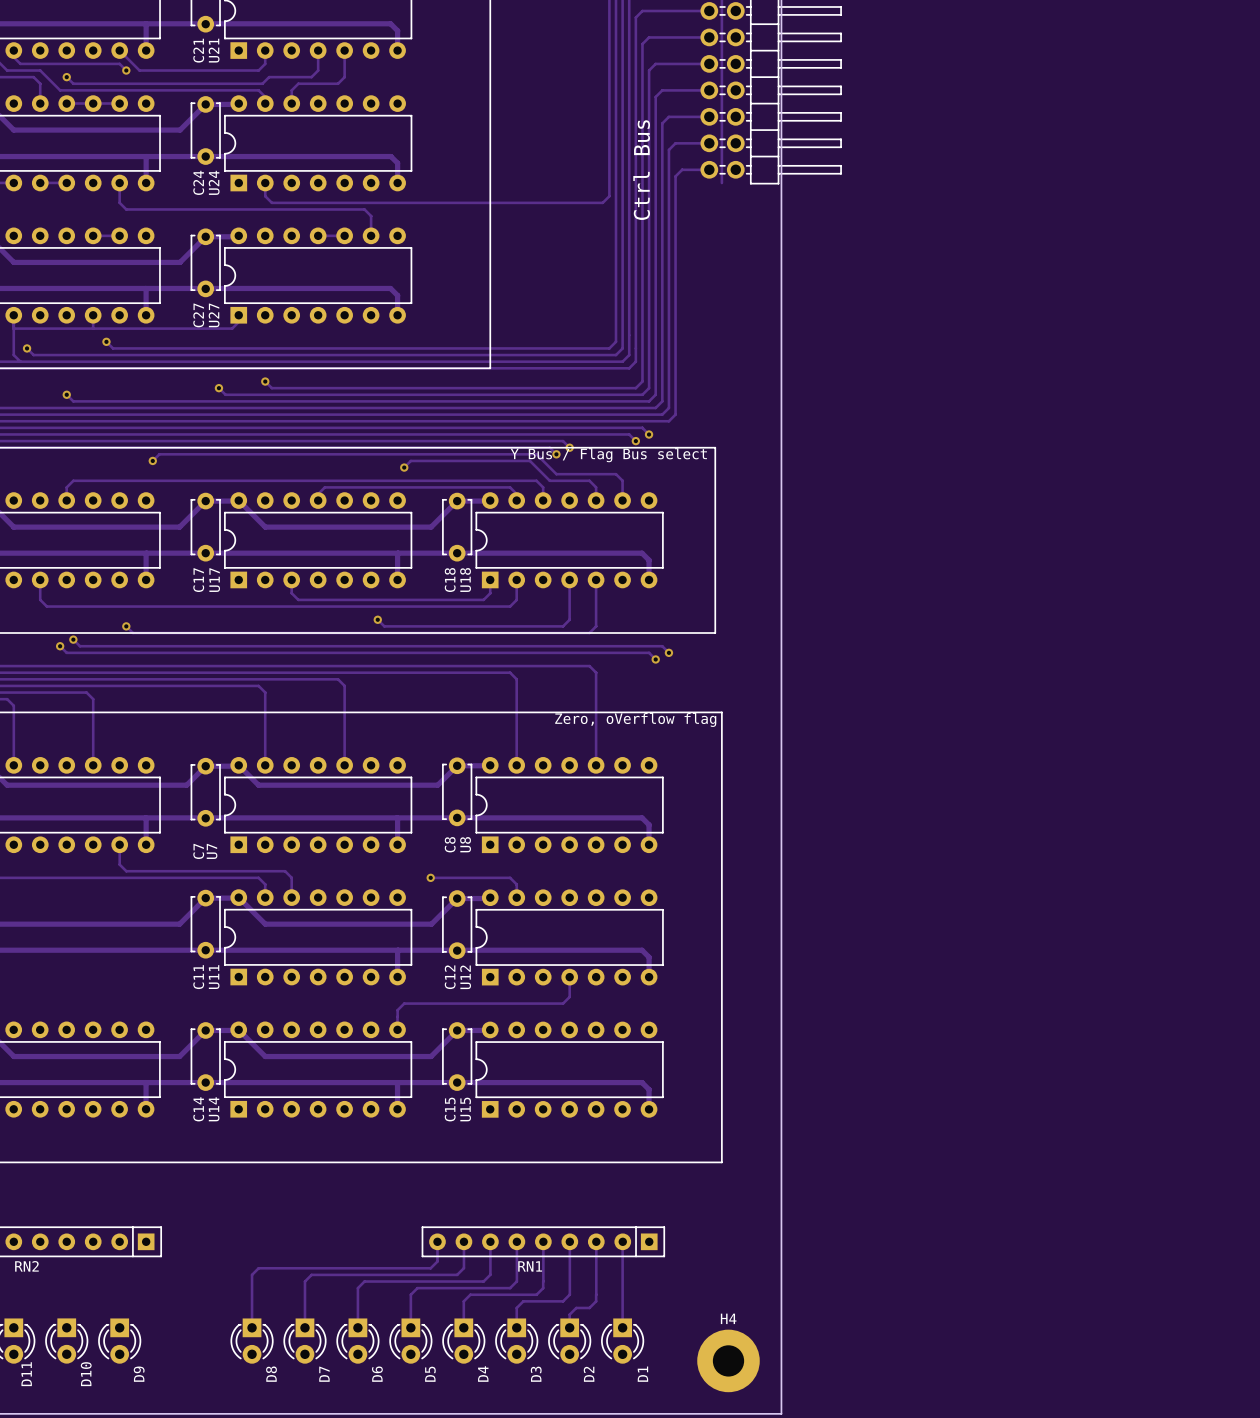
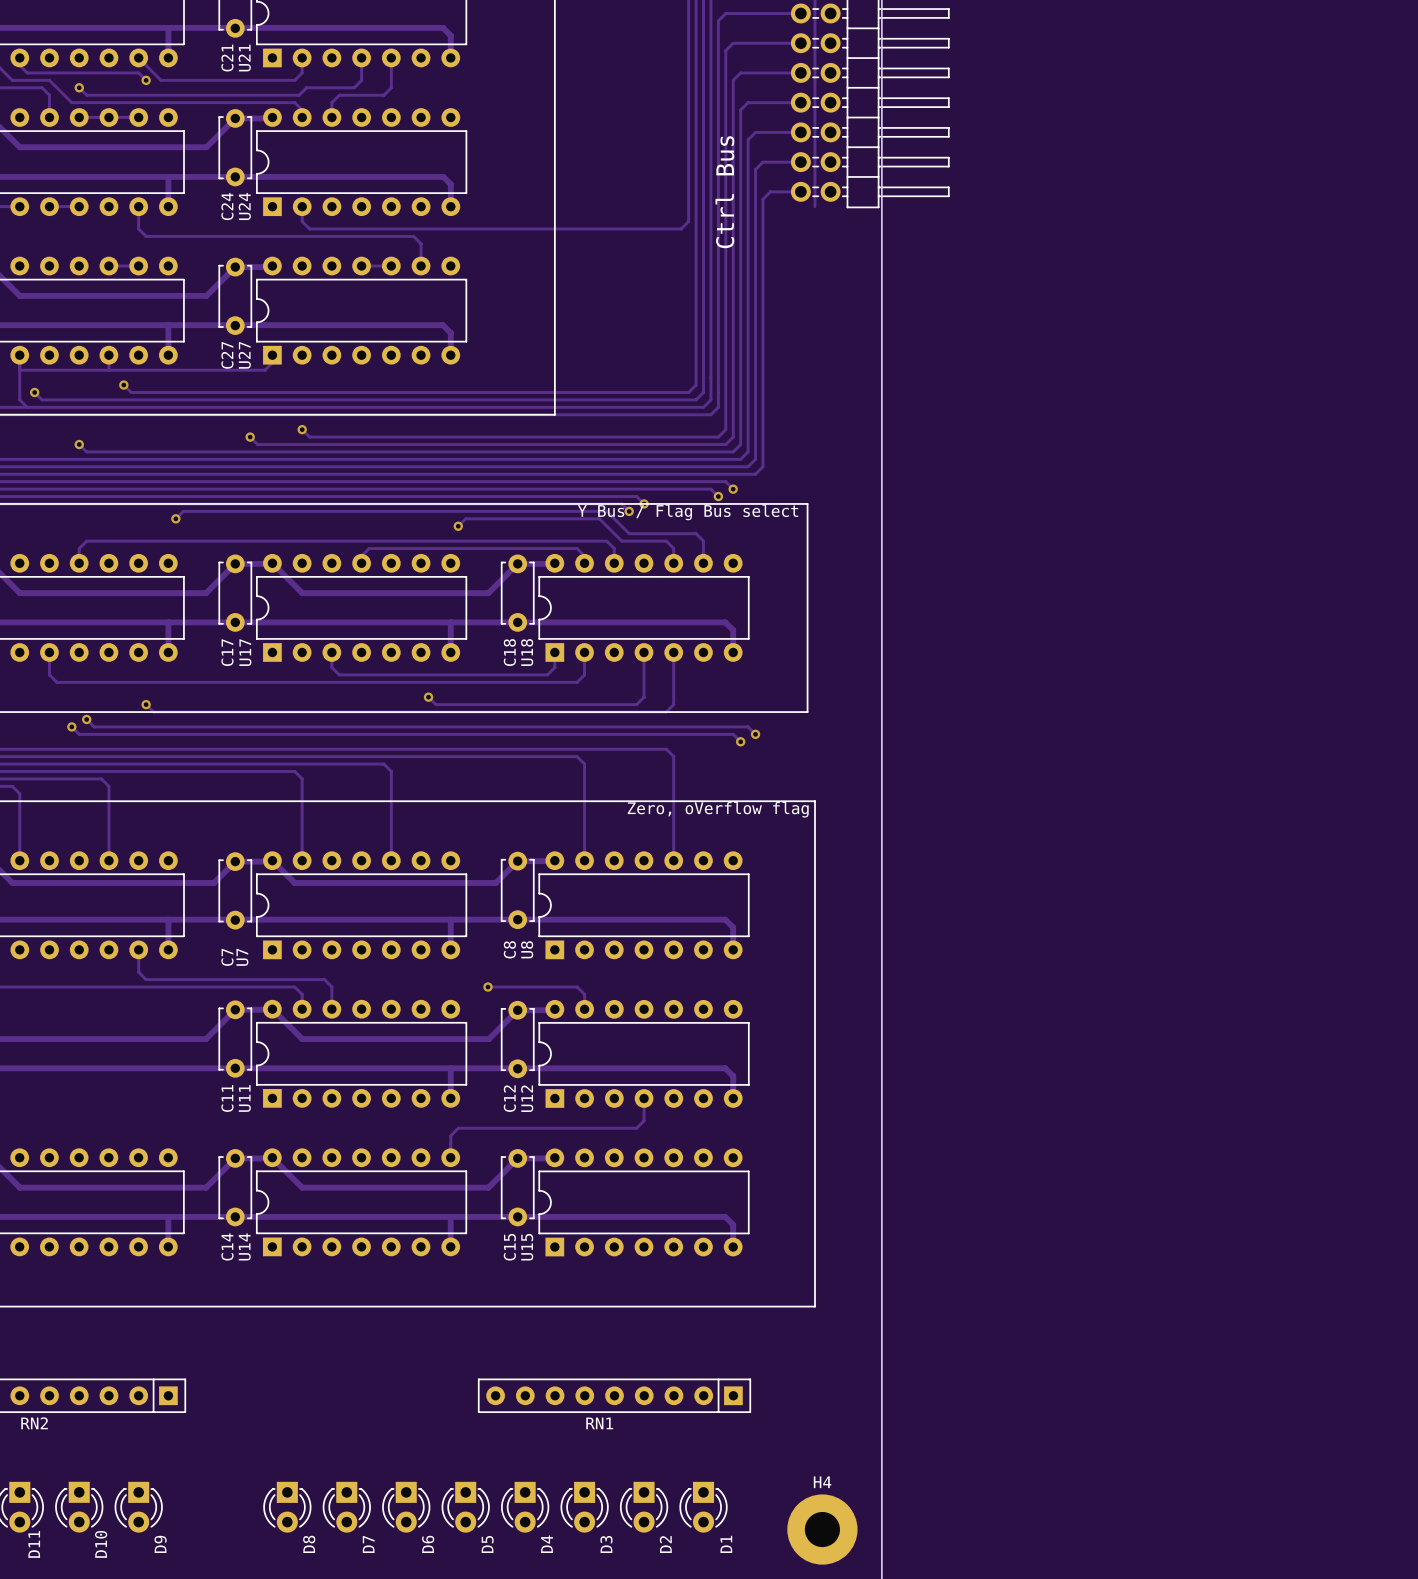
track: (437, 1241) (437, 1261) (430, 1268) (258, 1268) (252, 1274) (252, 1327) -> none
track: (463, 1241) (463, 1268) (457, 1274) (311, 1274) (304, 1281) (304, 1327) -> none
track: (490, 1241) (490, 1274) (483, 1281) (364, 1281) (357, 1288) (357, 1327) -> none
track: (516, 1241) (516, 1281) (510, 1288) (417, 1288) (410, 1294) (410, 1327) -> none
track: (543, 1241) (543, 1288) (536, 1294) (470, 1294) (463, 1301) (463, 1327) -> none
track: (569, 1241) (569, 1294) (563, 1301) (523, 1301) (516, 1307) (516, 1327) -> none
track: (596, 1241) (596, 1301) (589, 1307) (576, 1307) (569, 1314) (569, 1327) -> none
track: (622, 1241) (622, 1327) -> none

